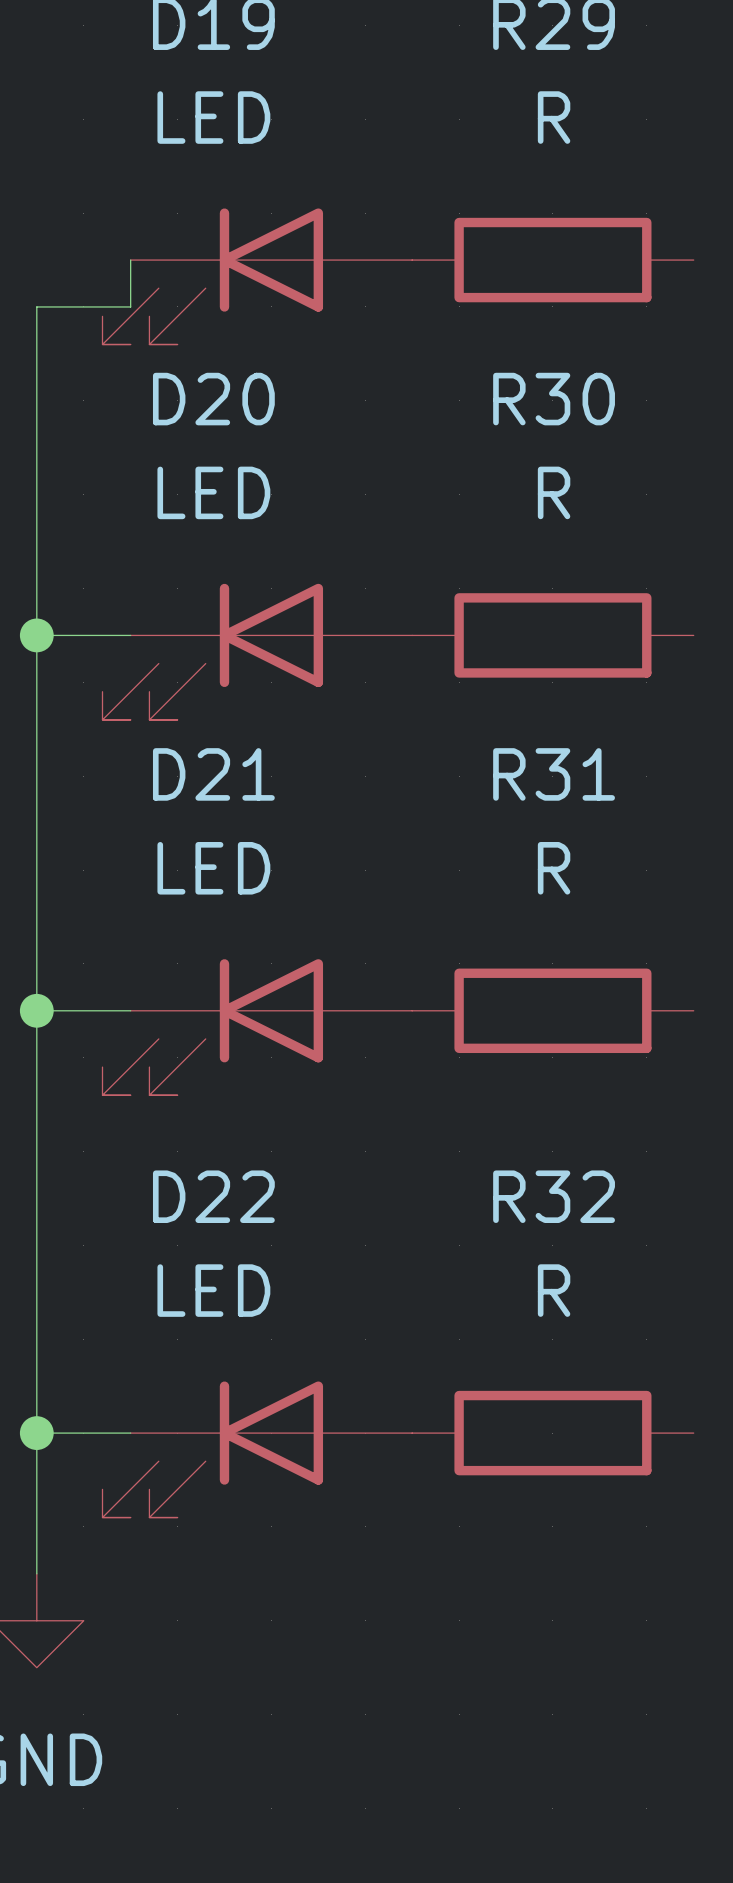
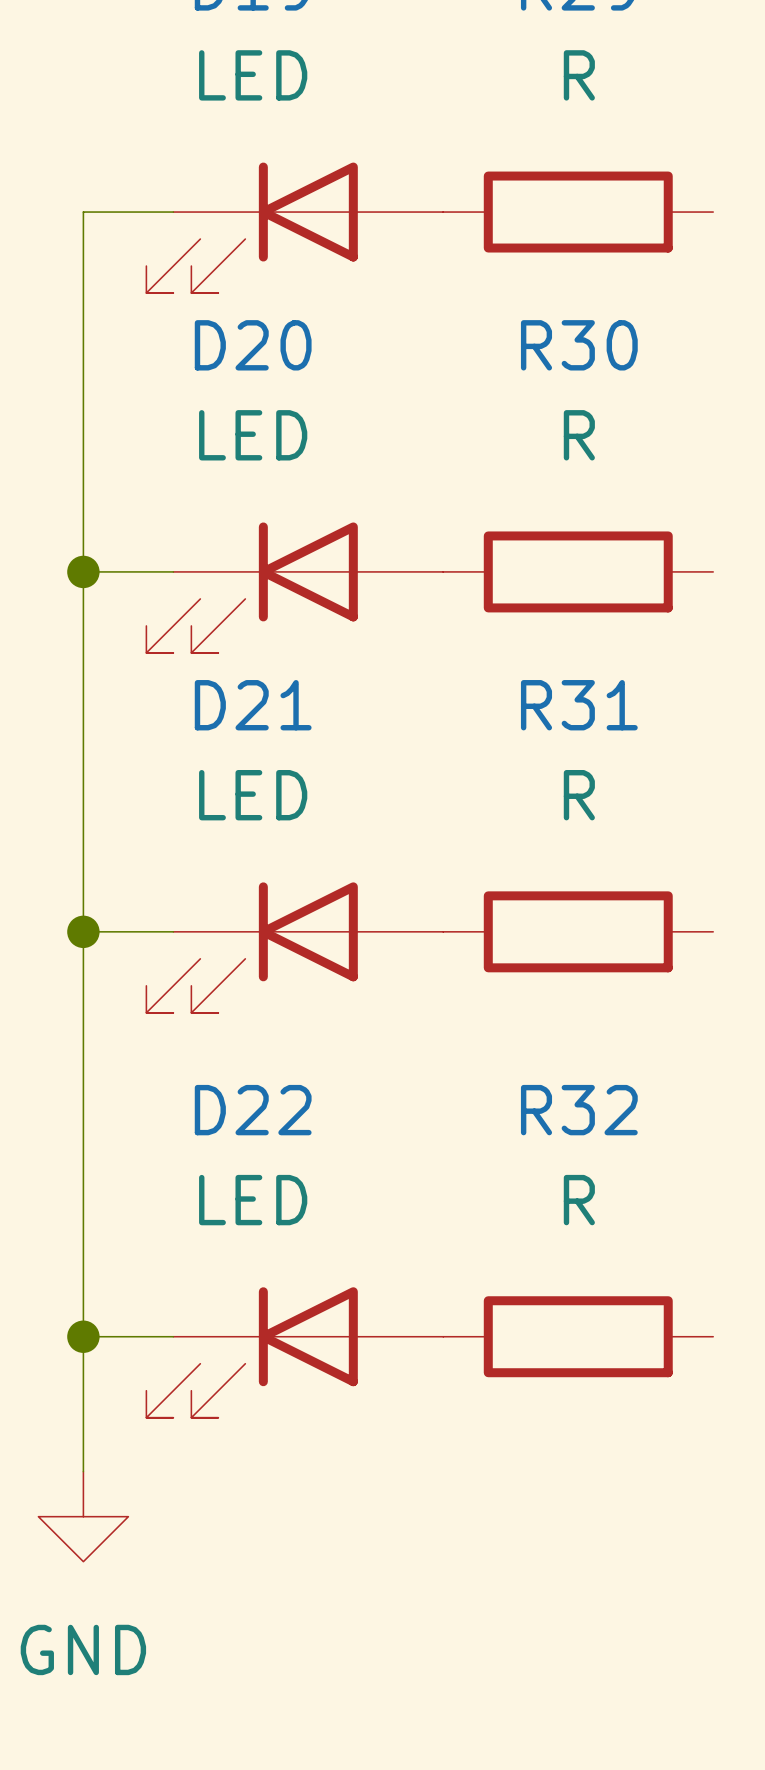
wire: (130, 260) (130, 306) (36, 306) -> (173, 212) (83, 212) (83, 257)

